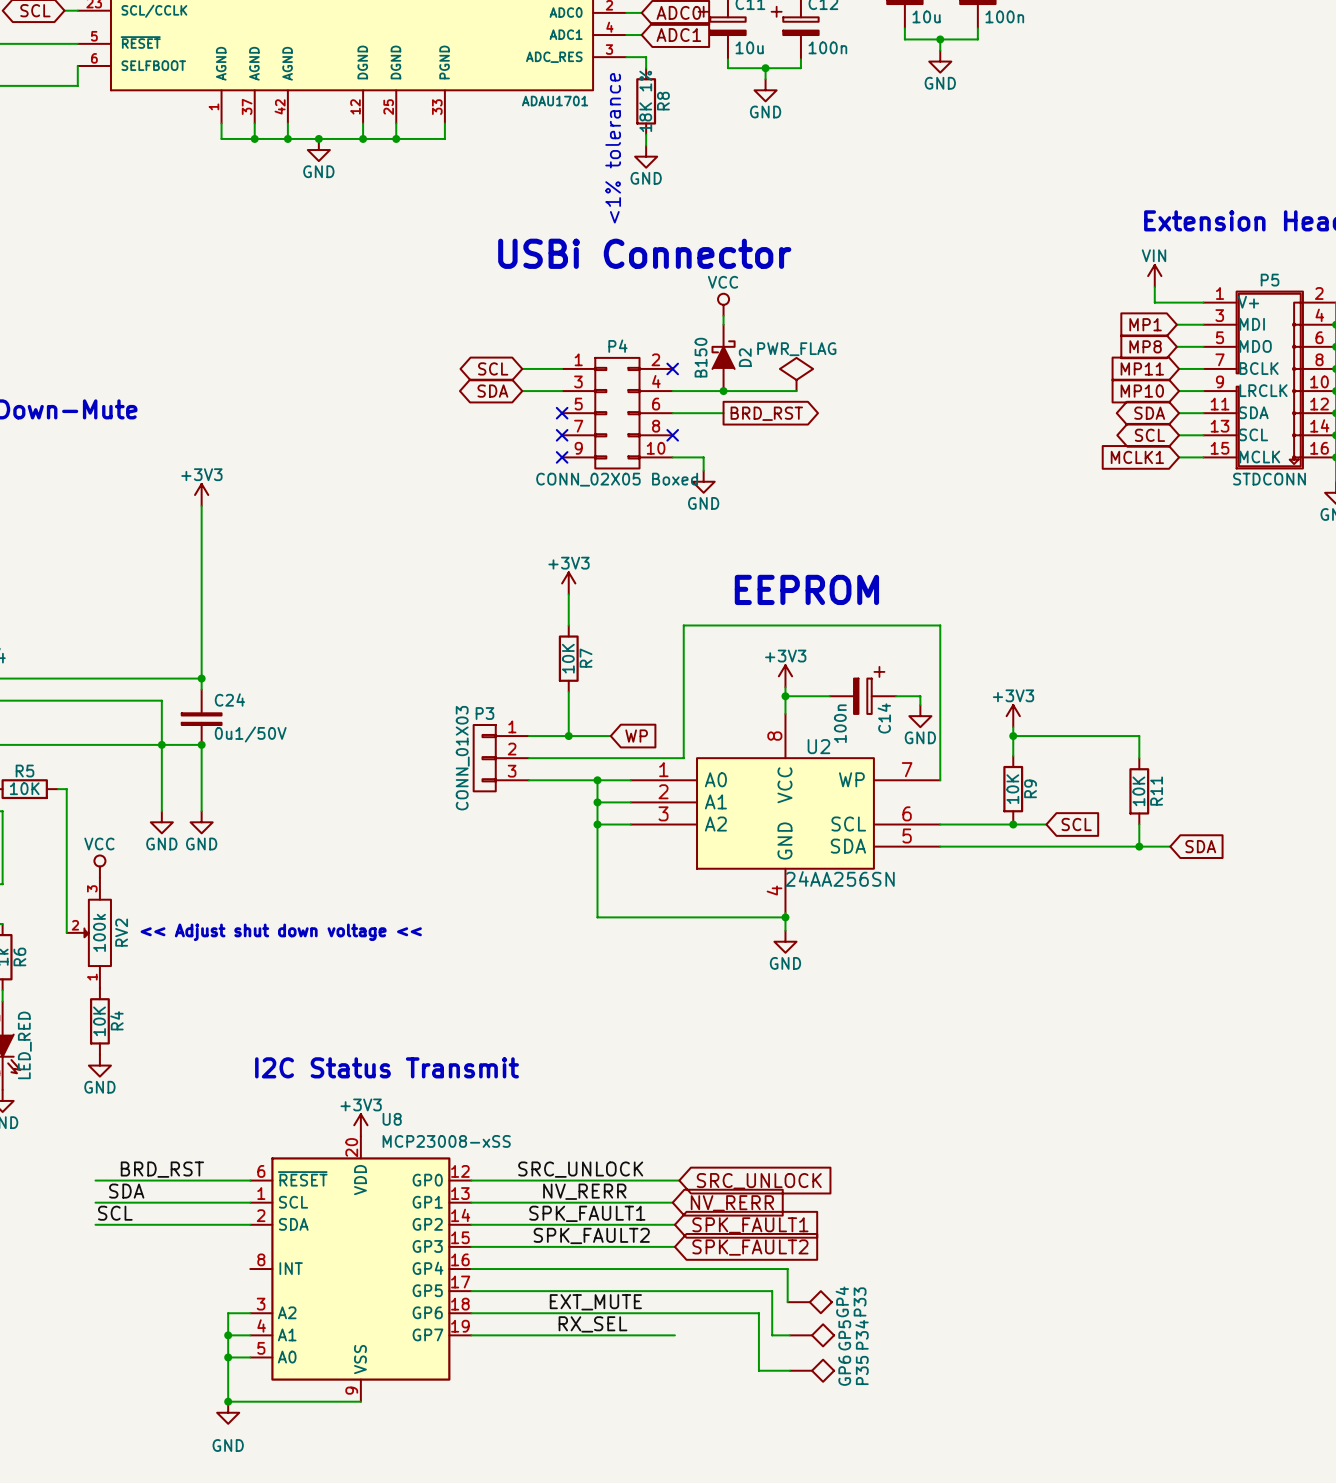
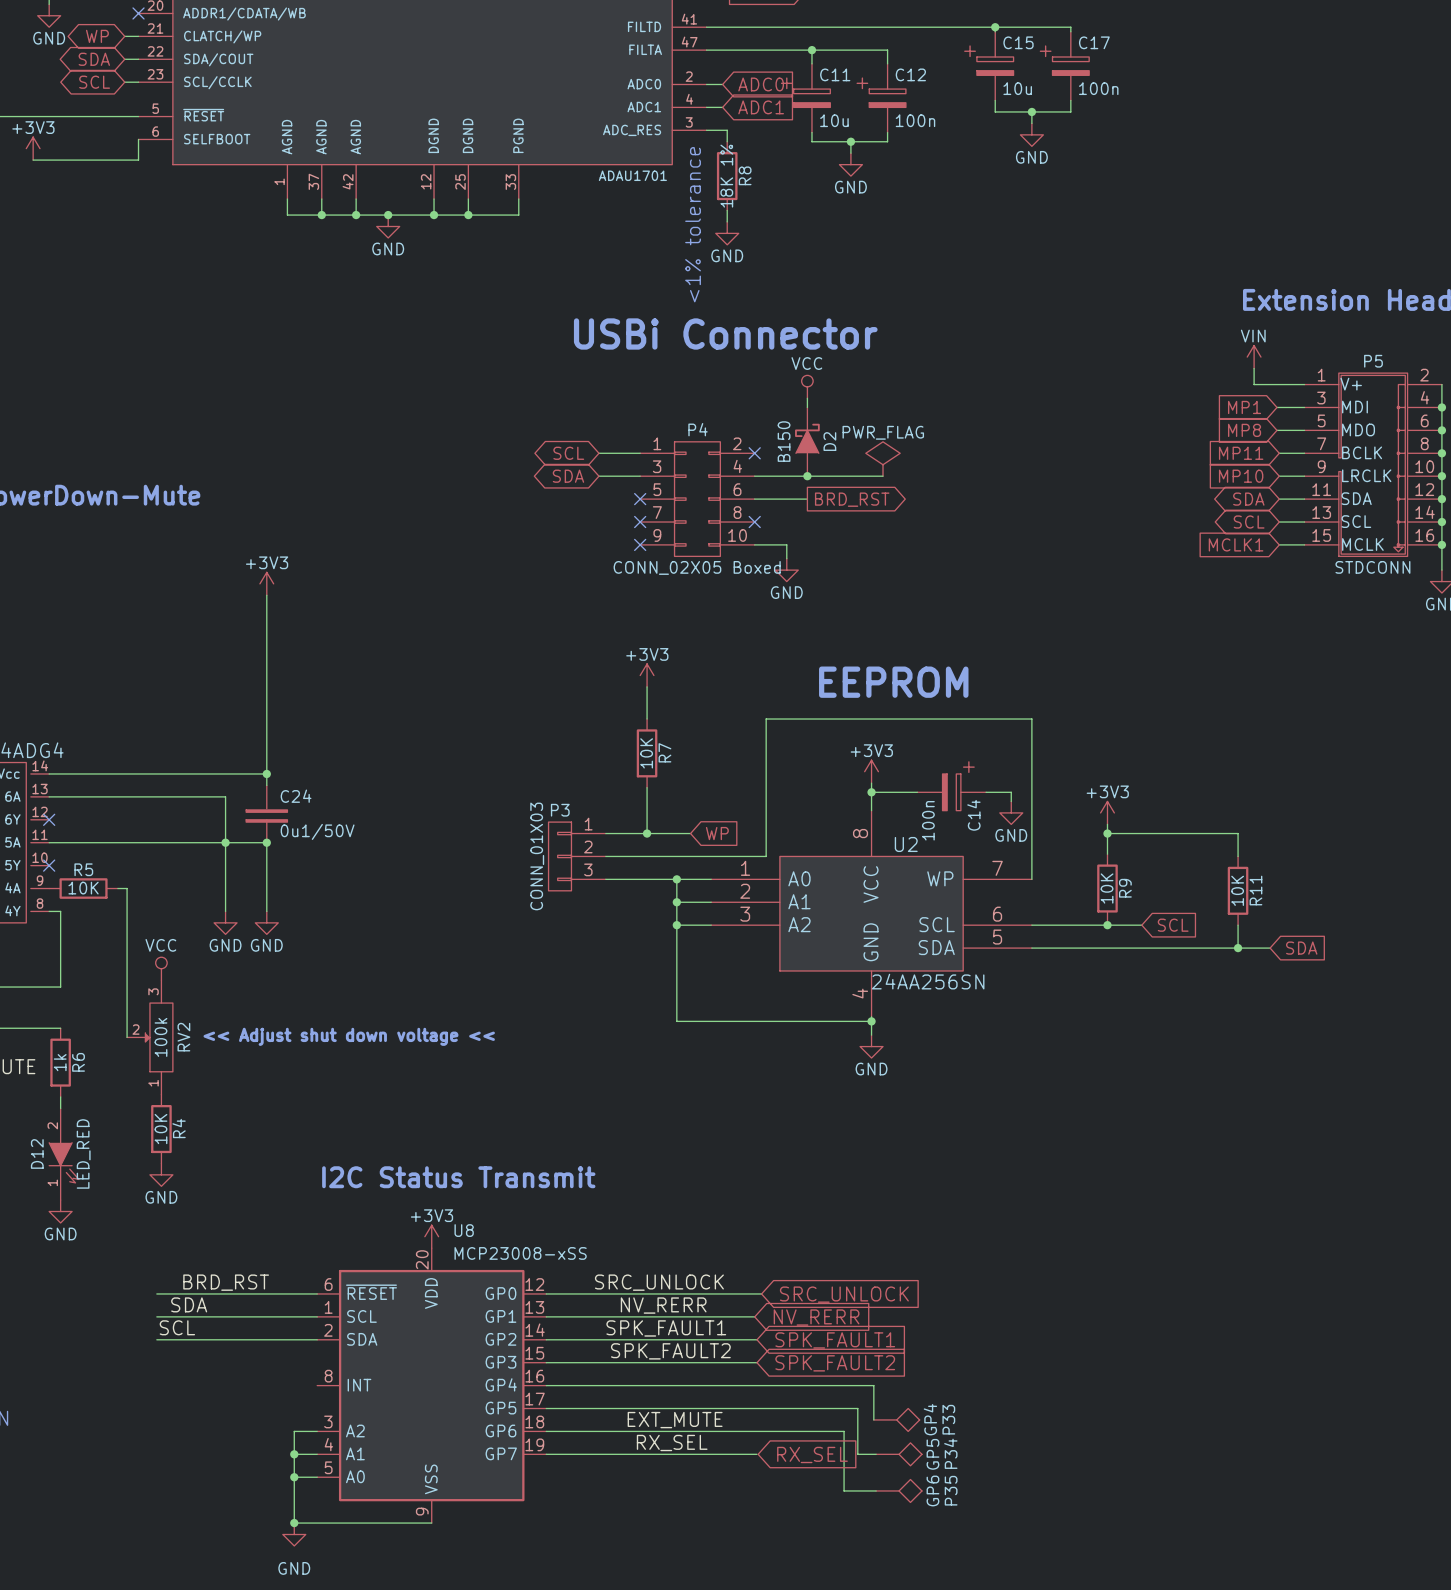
global label: none -> RX_SEL (812, 1454)

